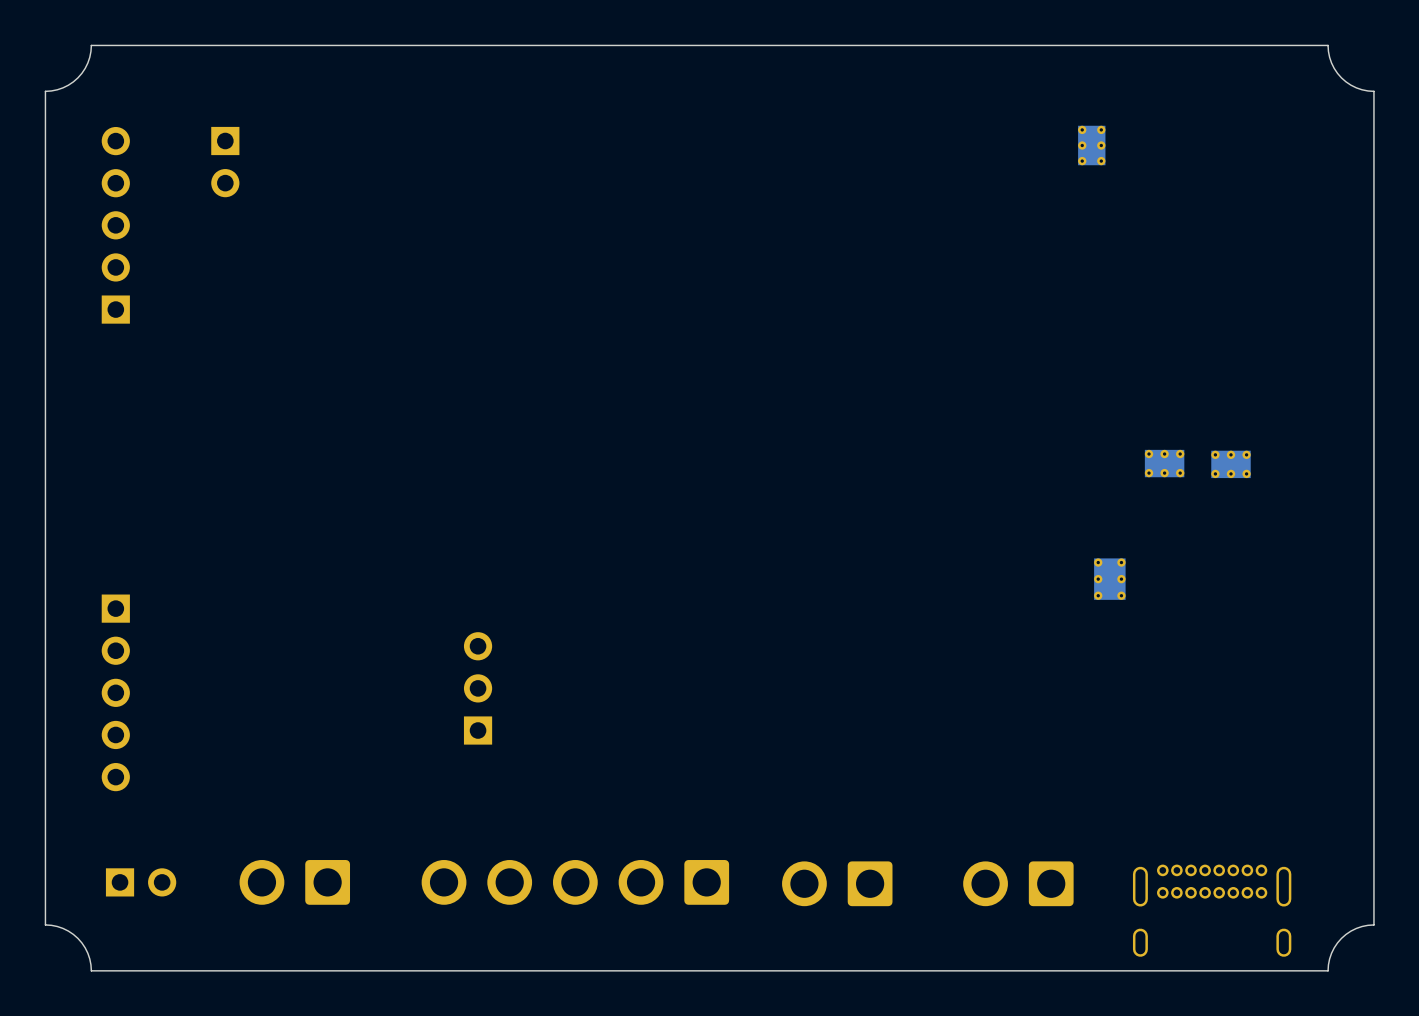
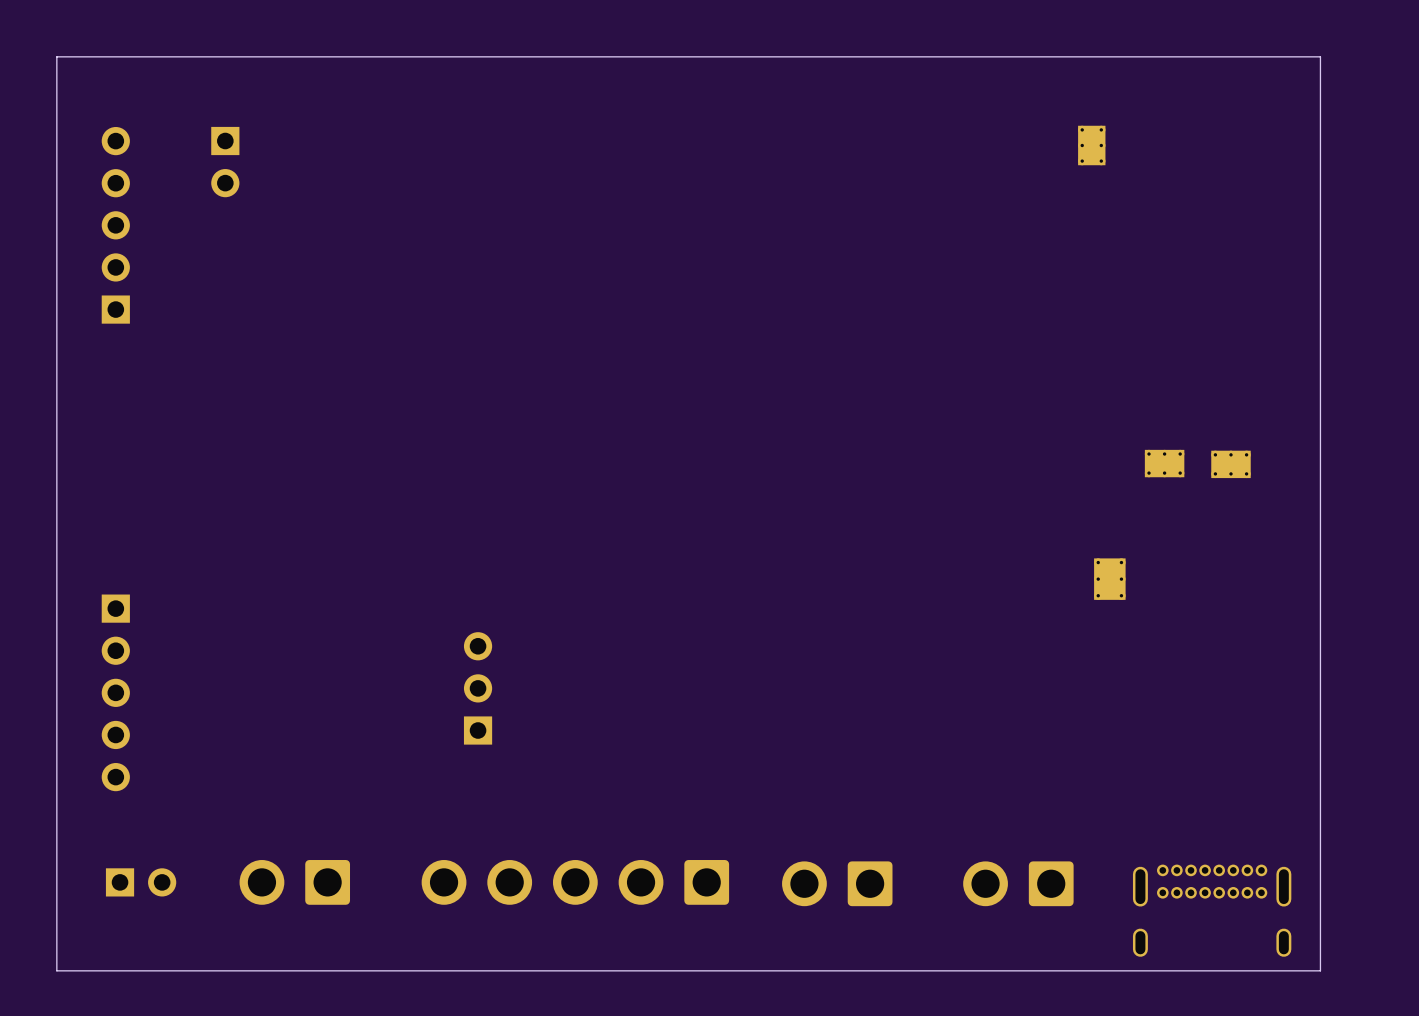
board edge: (1320, 970) (1328, 970) (1329, 958) (1334, 947) (1346, 934) (1356, 928) (1373, 924) (1373, 91) (1356, 87) (1341, 77) (1331, 63) (1328, 45) (91, 45) (87, 63) (77, 77) (63, 87) (45, 91) (45, 924) (63, 928) (77, 938) (87, 953) (91, 970) -> (1320, 970) (1320, 56) (56, 56) (56, 970) (91, 970)

